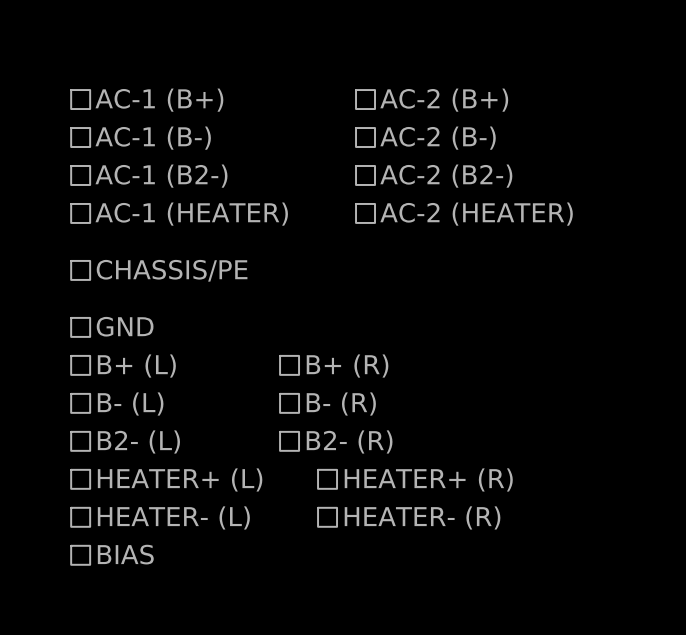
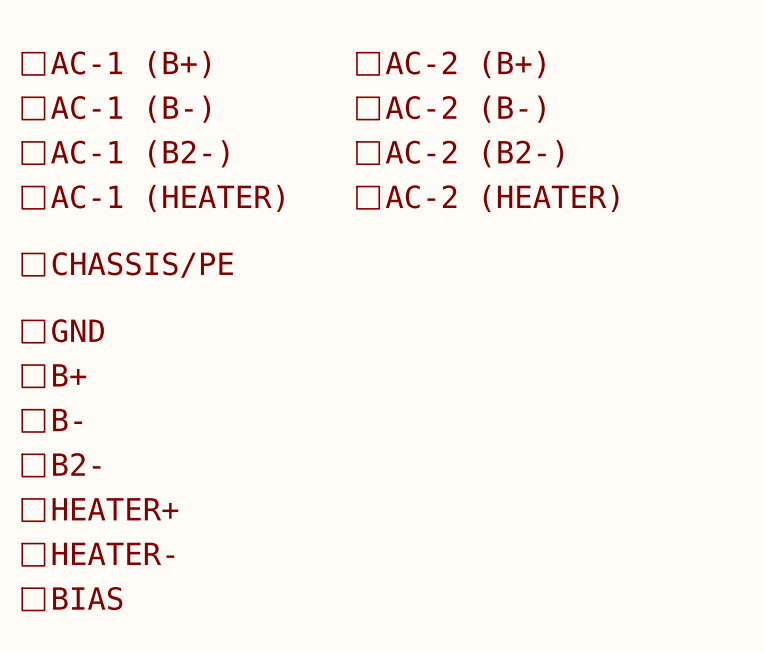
hierarchical label: B+ (L) (136, 366) -> B+ (69, 375)
hierarchical label: B+ (R) (347, 366) -> none
hierarchical label: B- (L) (130, 404) -> B- (67, 420)
hierarchical label: B- (R) (341, 404) -> none
hierarchical label: B2- (L) (138, 441) -> B2- (76, 464)
hierarchical label: B2- (R) (349, 441) -> none
hierarchical label: HEATER+ (L) (180, 479) -> HEATER+ (115, 509)
hierarchical label: HEATER+ (R) (428, 479) -> none
hierarchical label: HEATER- (L) (173, 517) -> HEATER- (113, 553)
hierarchical label: HEATER- (R) (422, 517) -> none

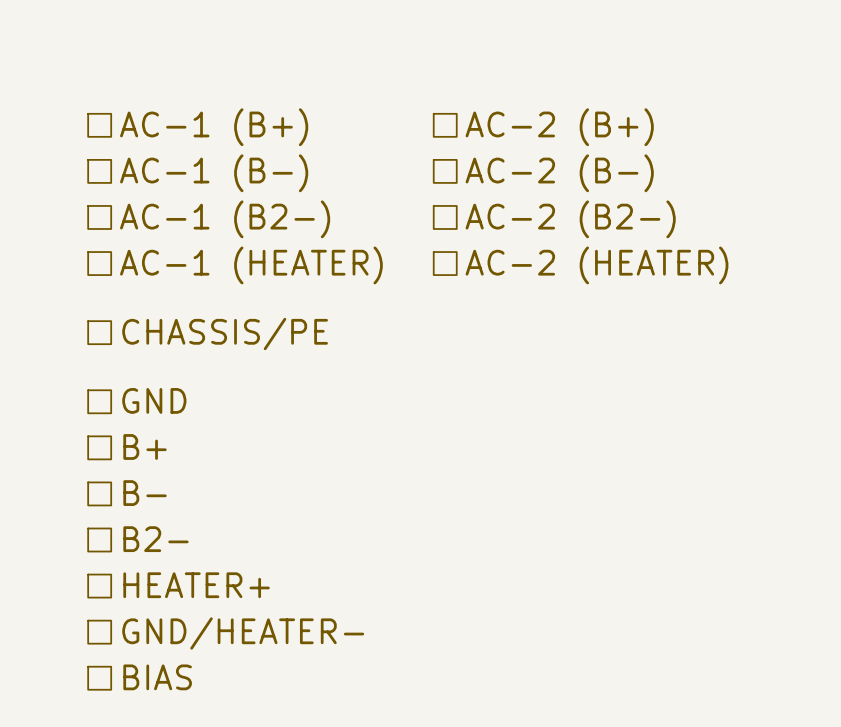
hierarchical label: HEATER- (113, 553) -> GND/HEATER- (243, 633)

